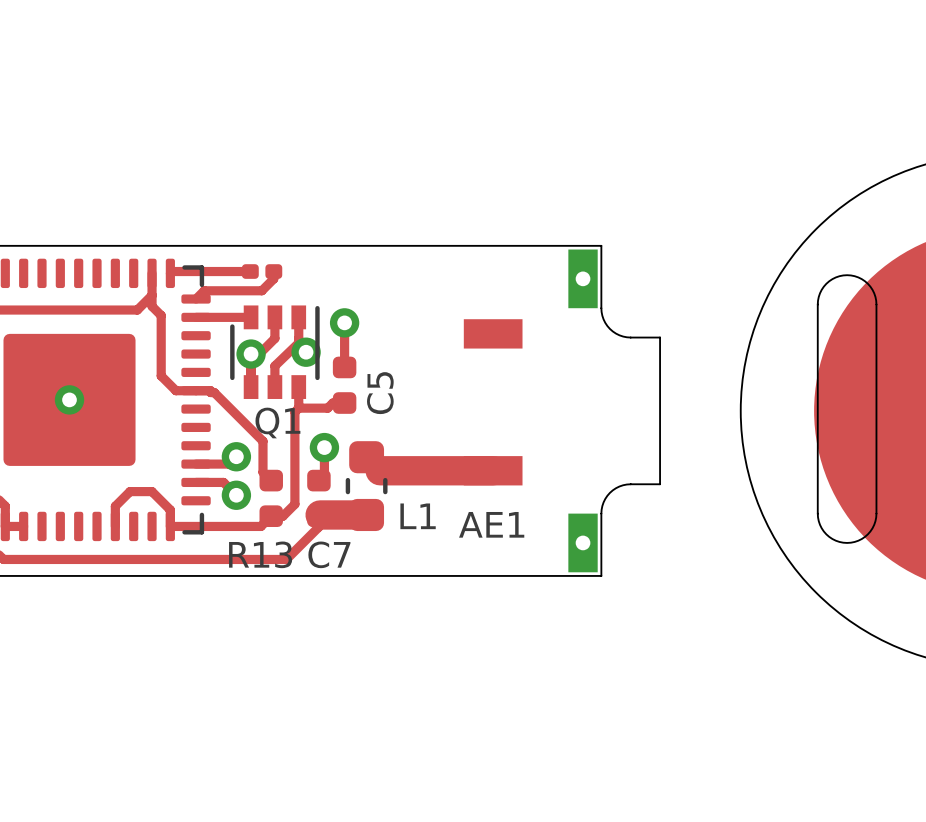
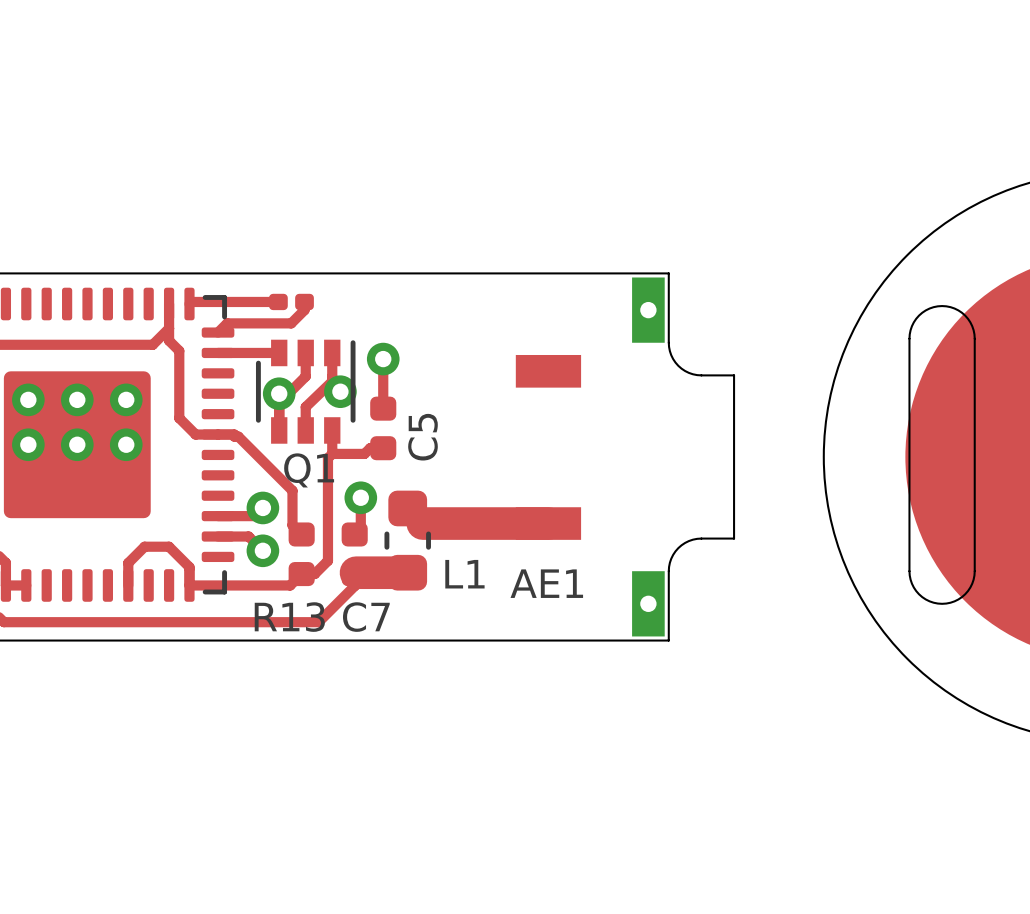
via: none -> (28, 399)
via: none -> (77, 399)
via: none -> (126, 399)
via: none -> (28, 444)
via: none -> (126, 444)

